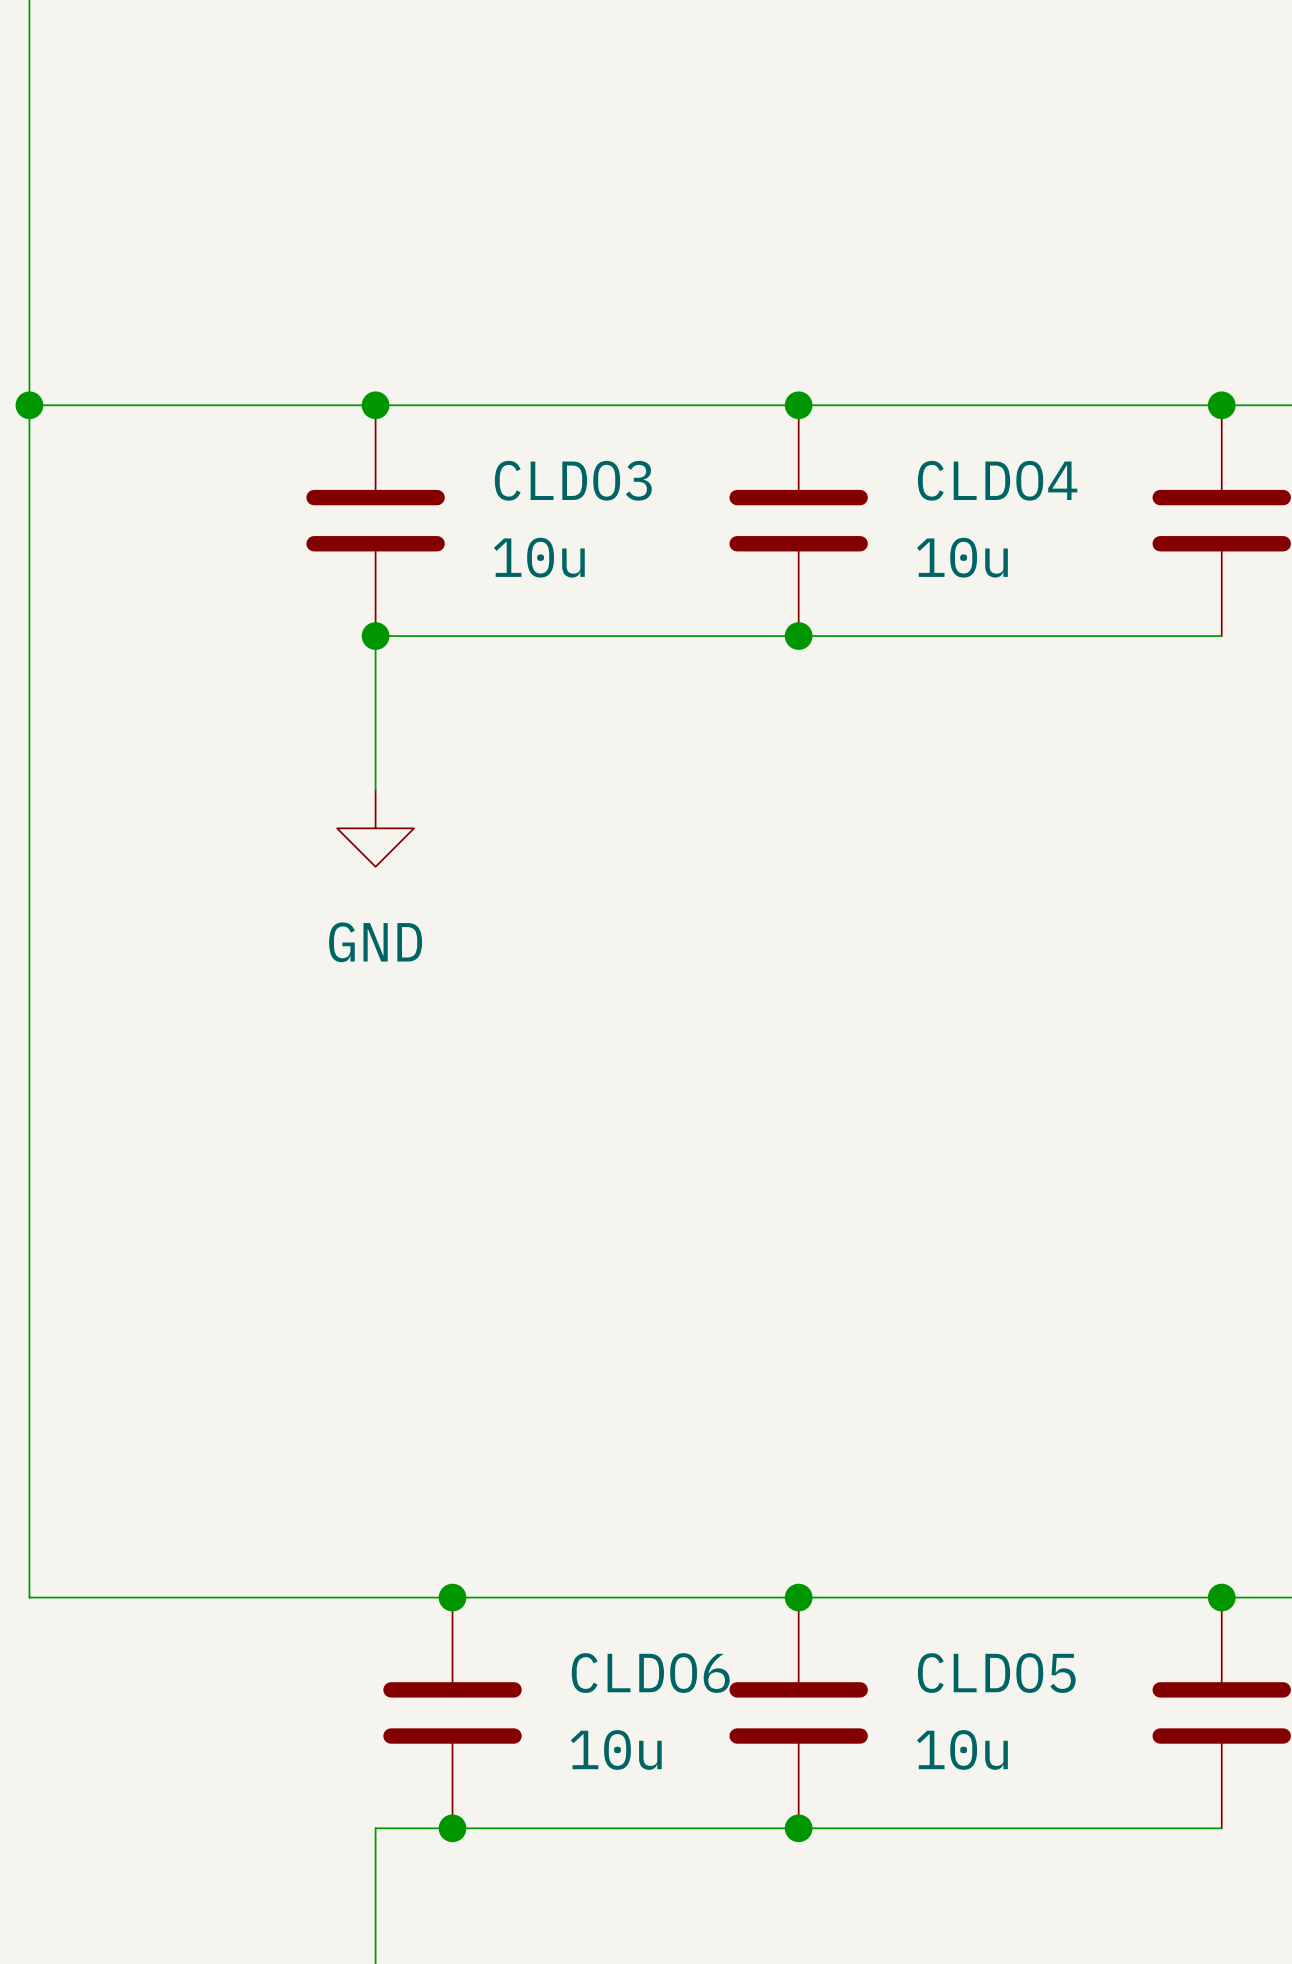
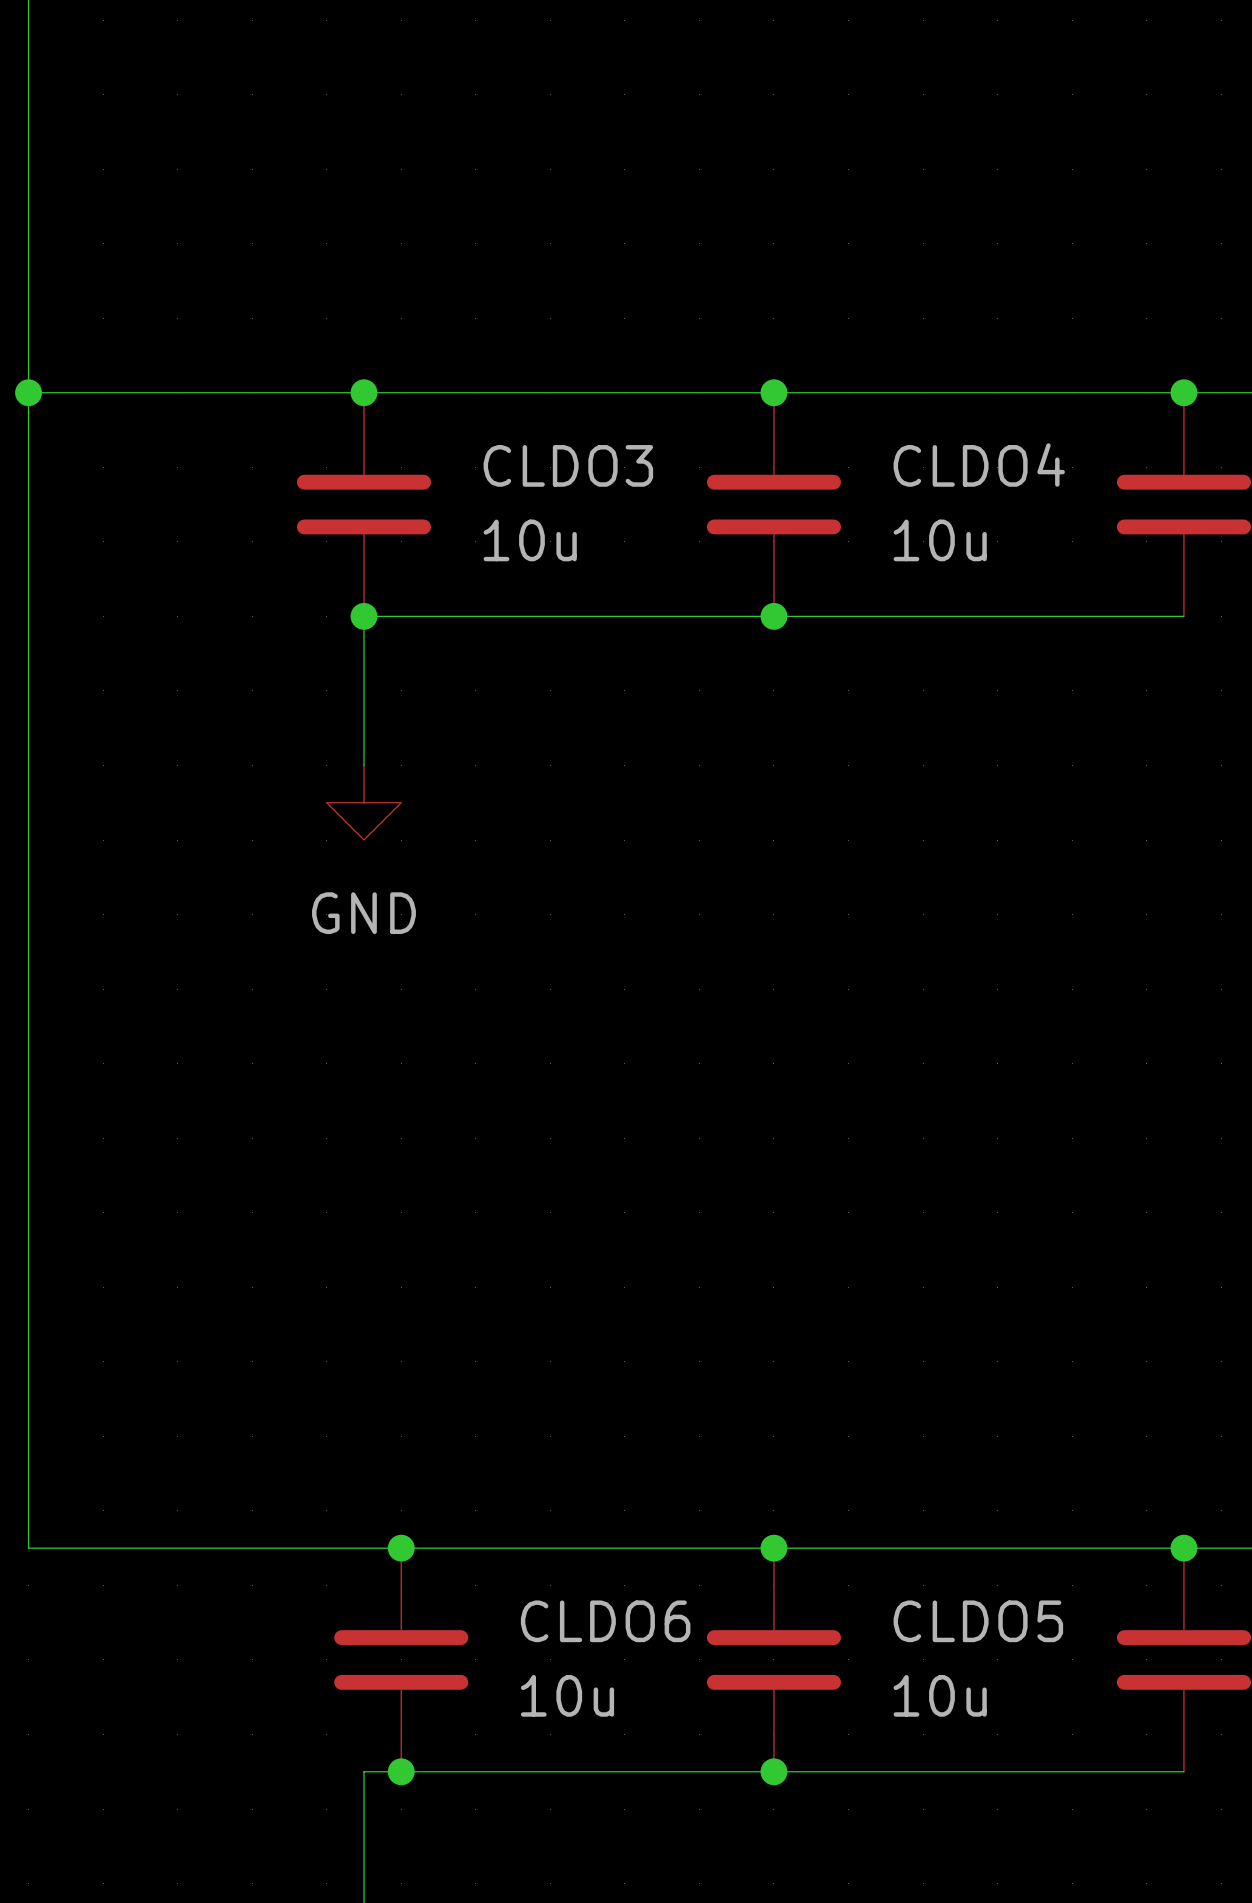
junction position: (452, 1597) -> (401, 1548)
CLDO6 position: (452, 1712) -> (401, 1659)
junction position: (452, 1828) -> (401, 1771)

